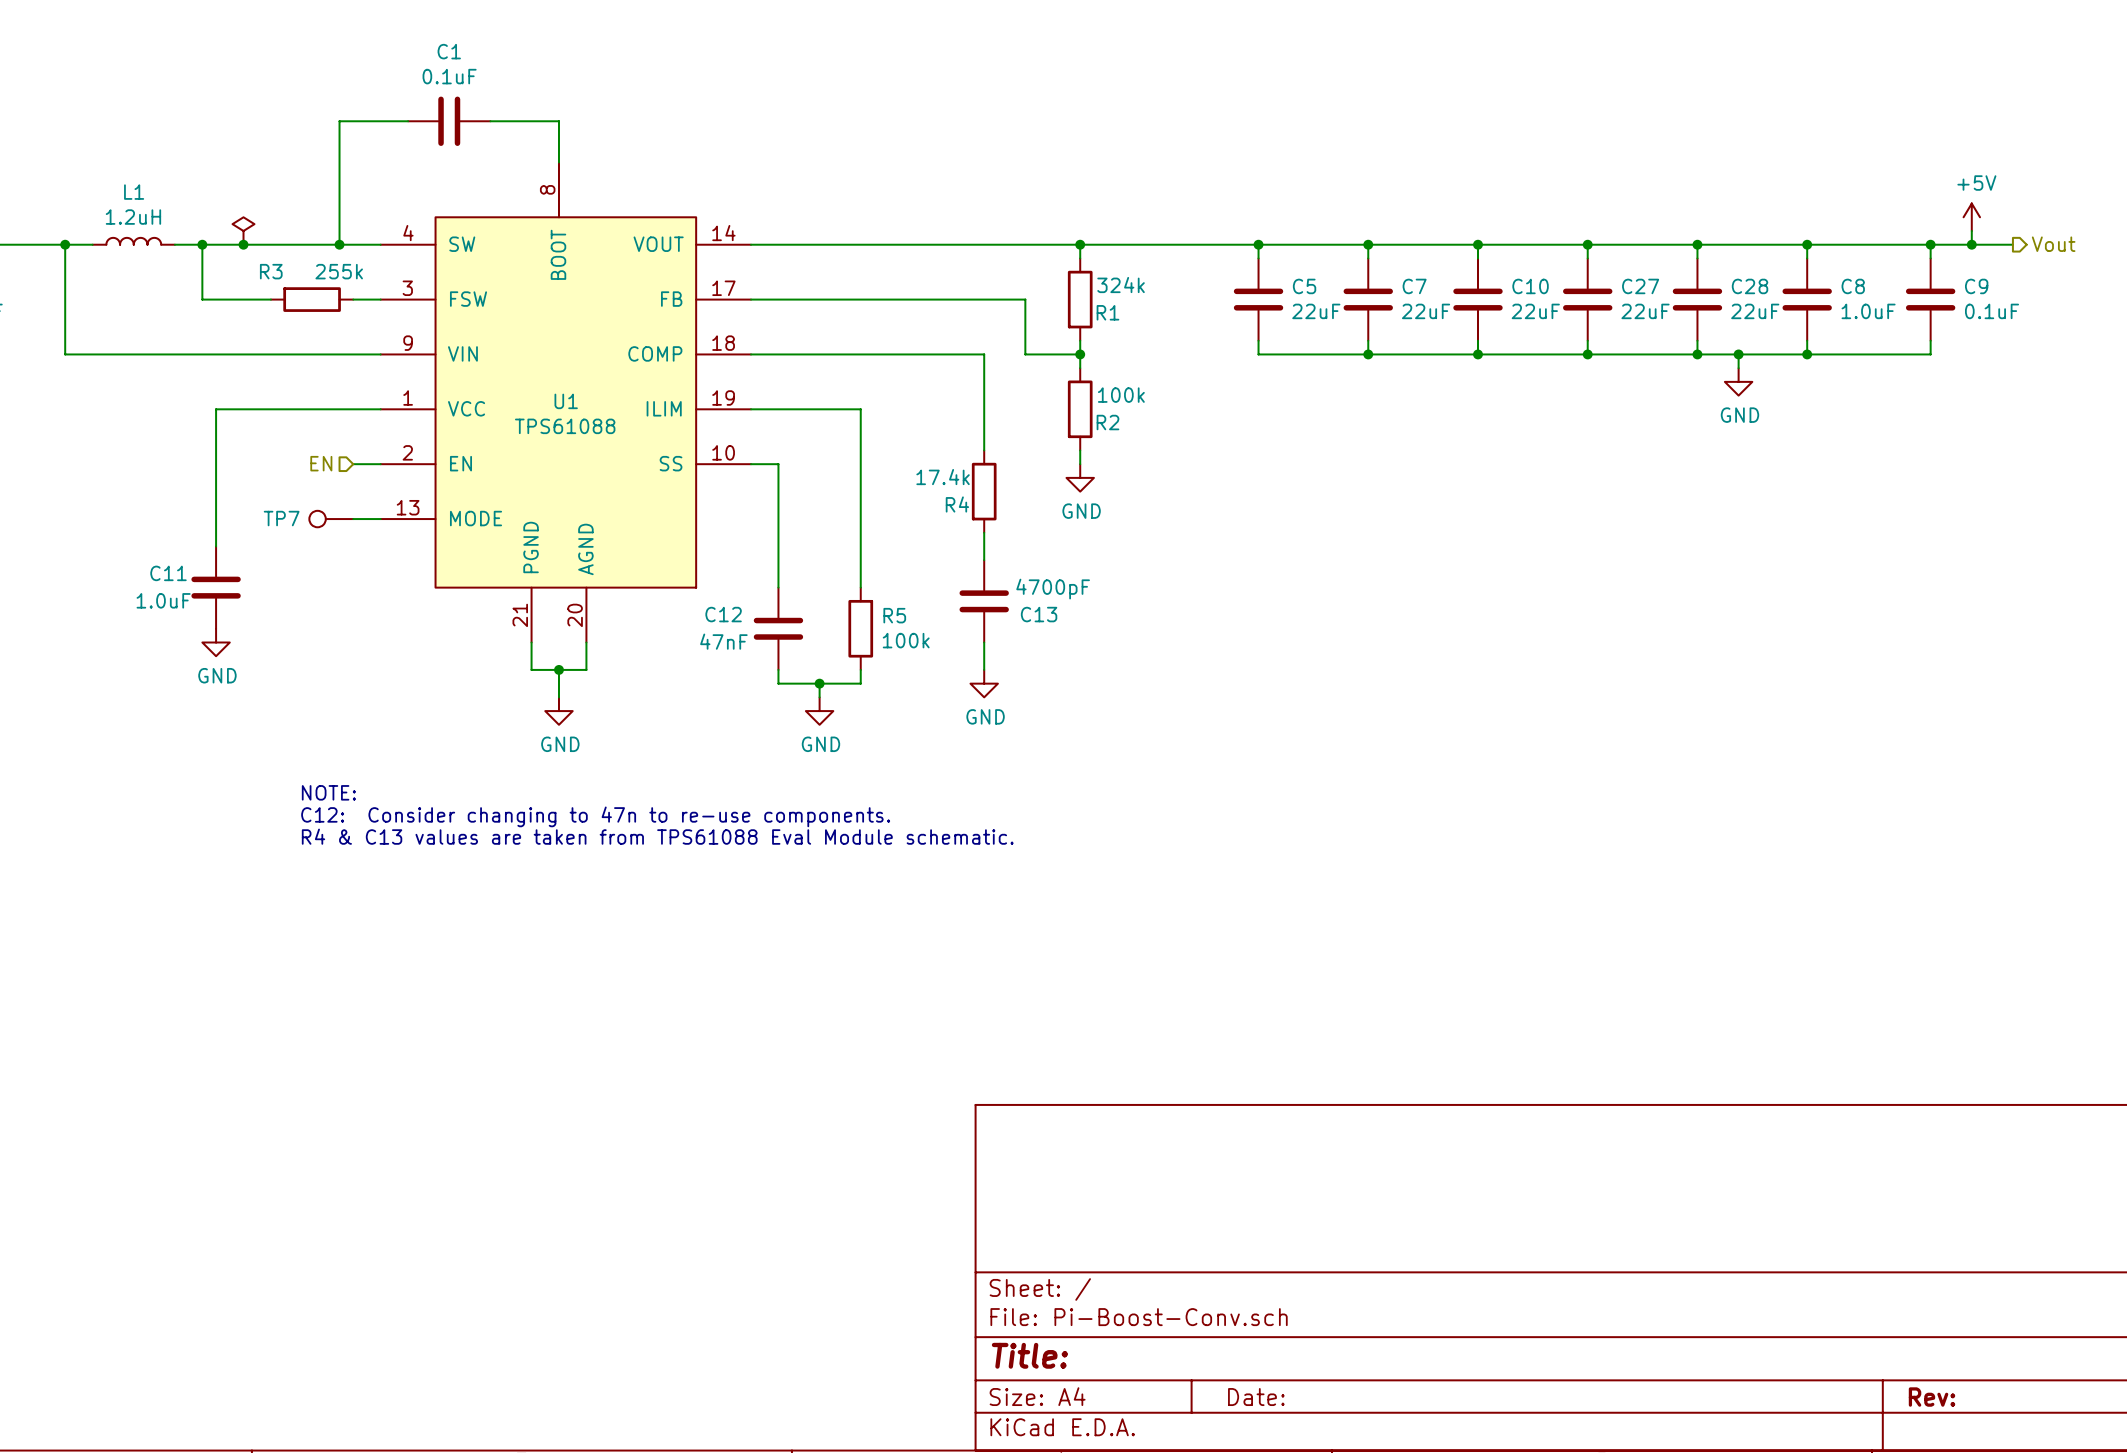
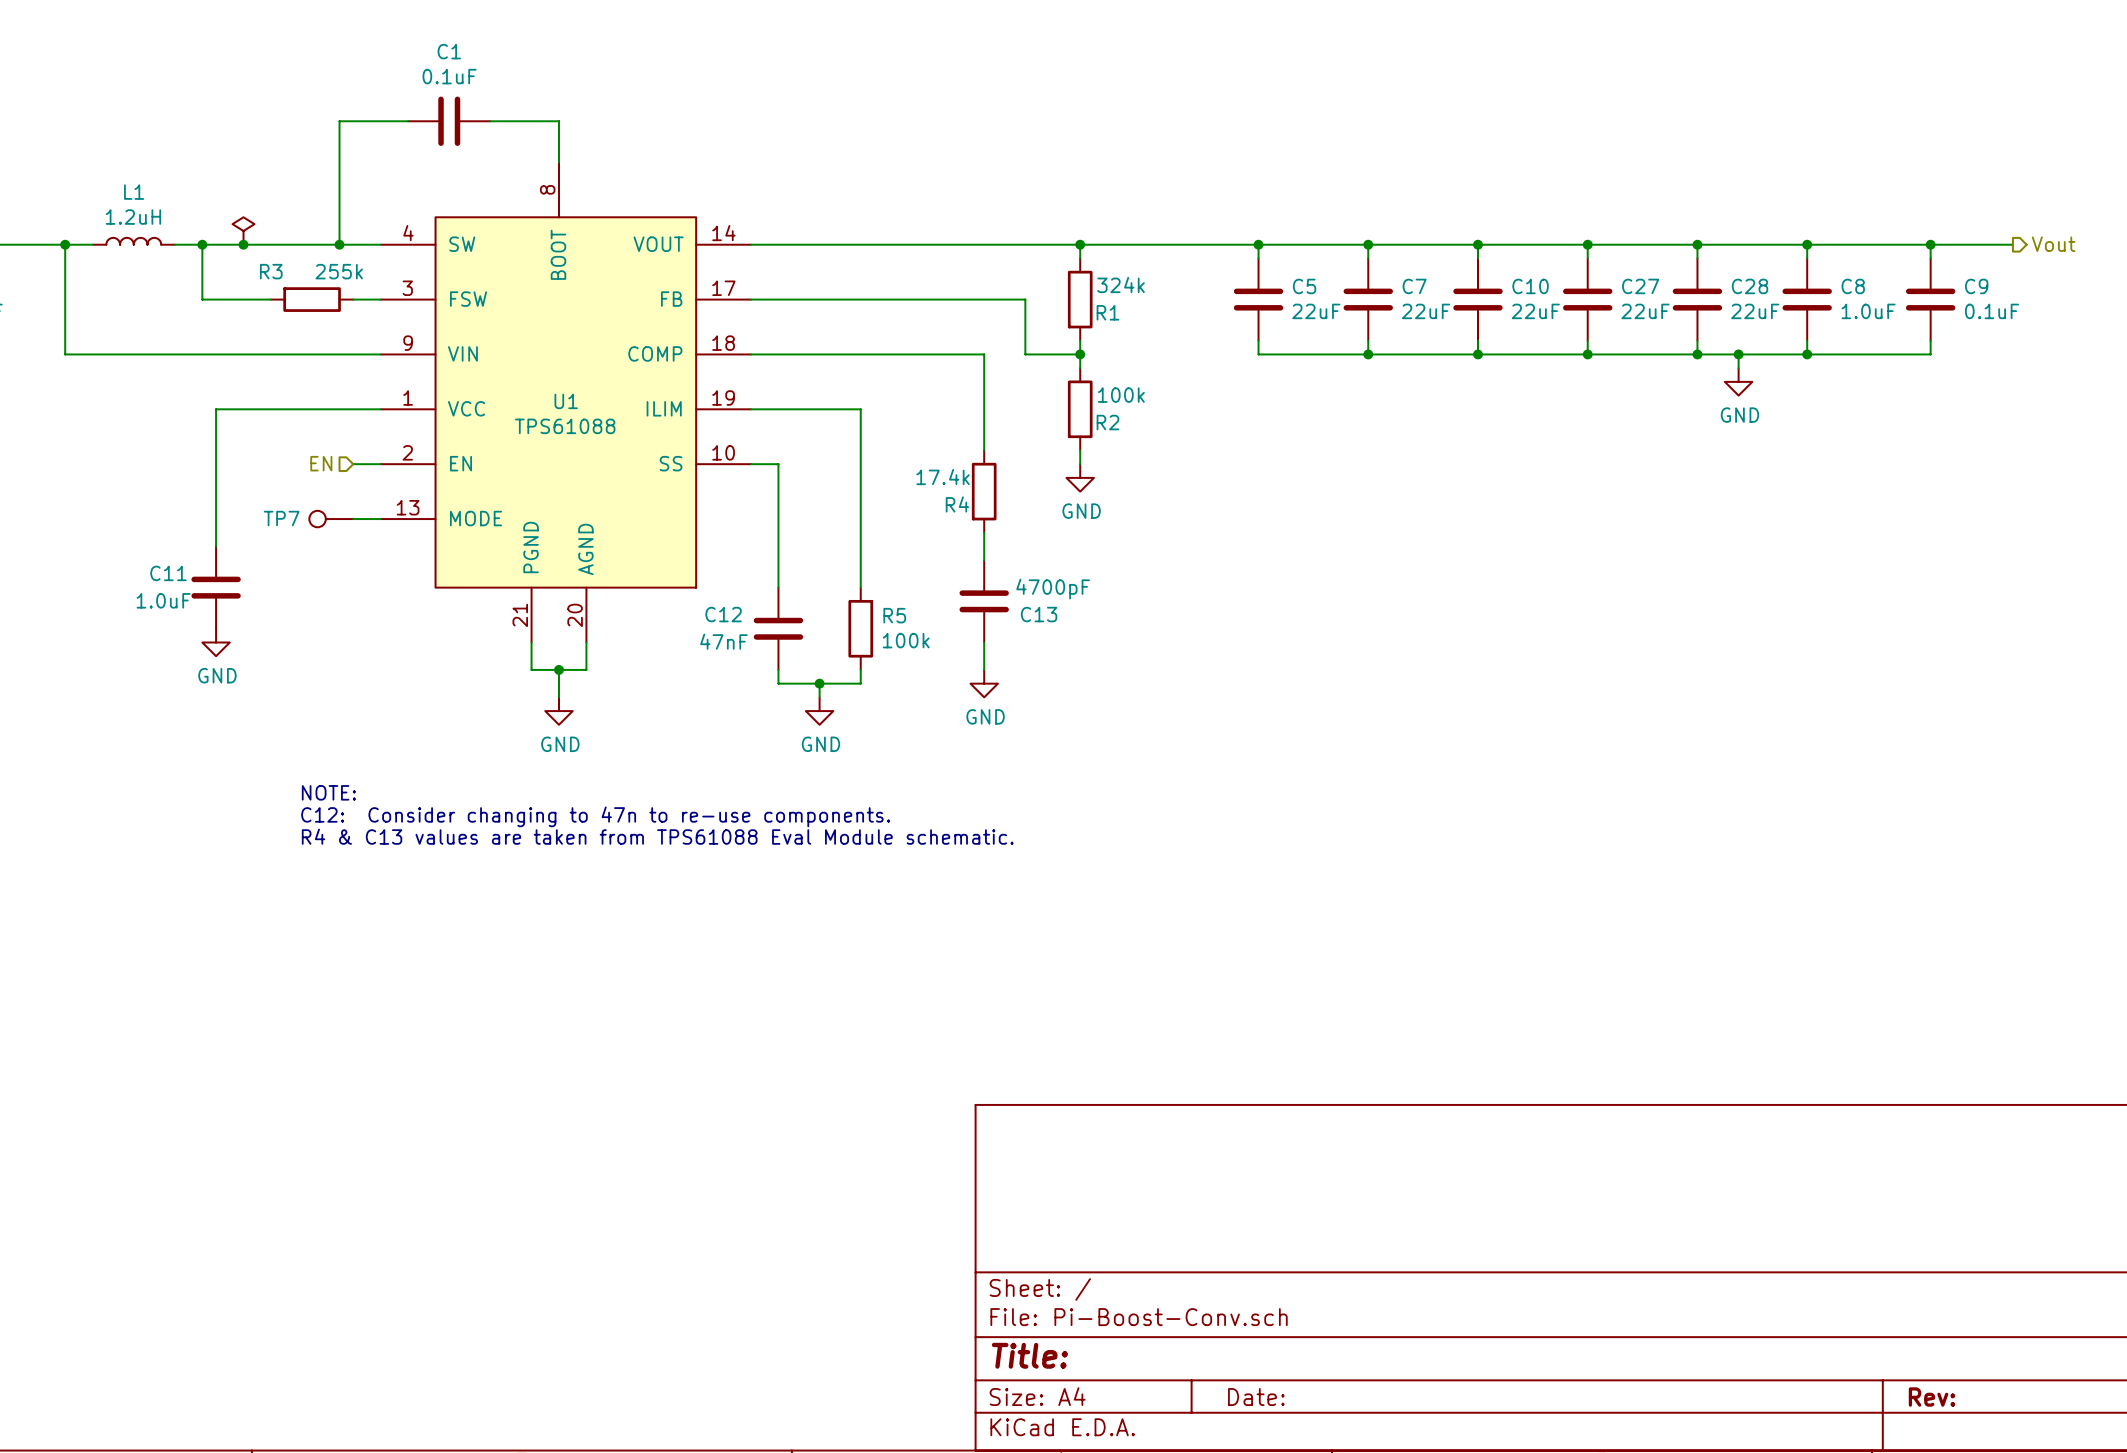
power symbol: +5V (1971, 217) -> none
wire: (1971, 231) (1971, 244) -> none
junction: (1971, 244) -> none

